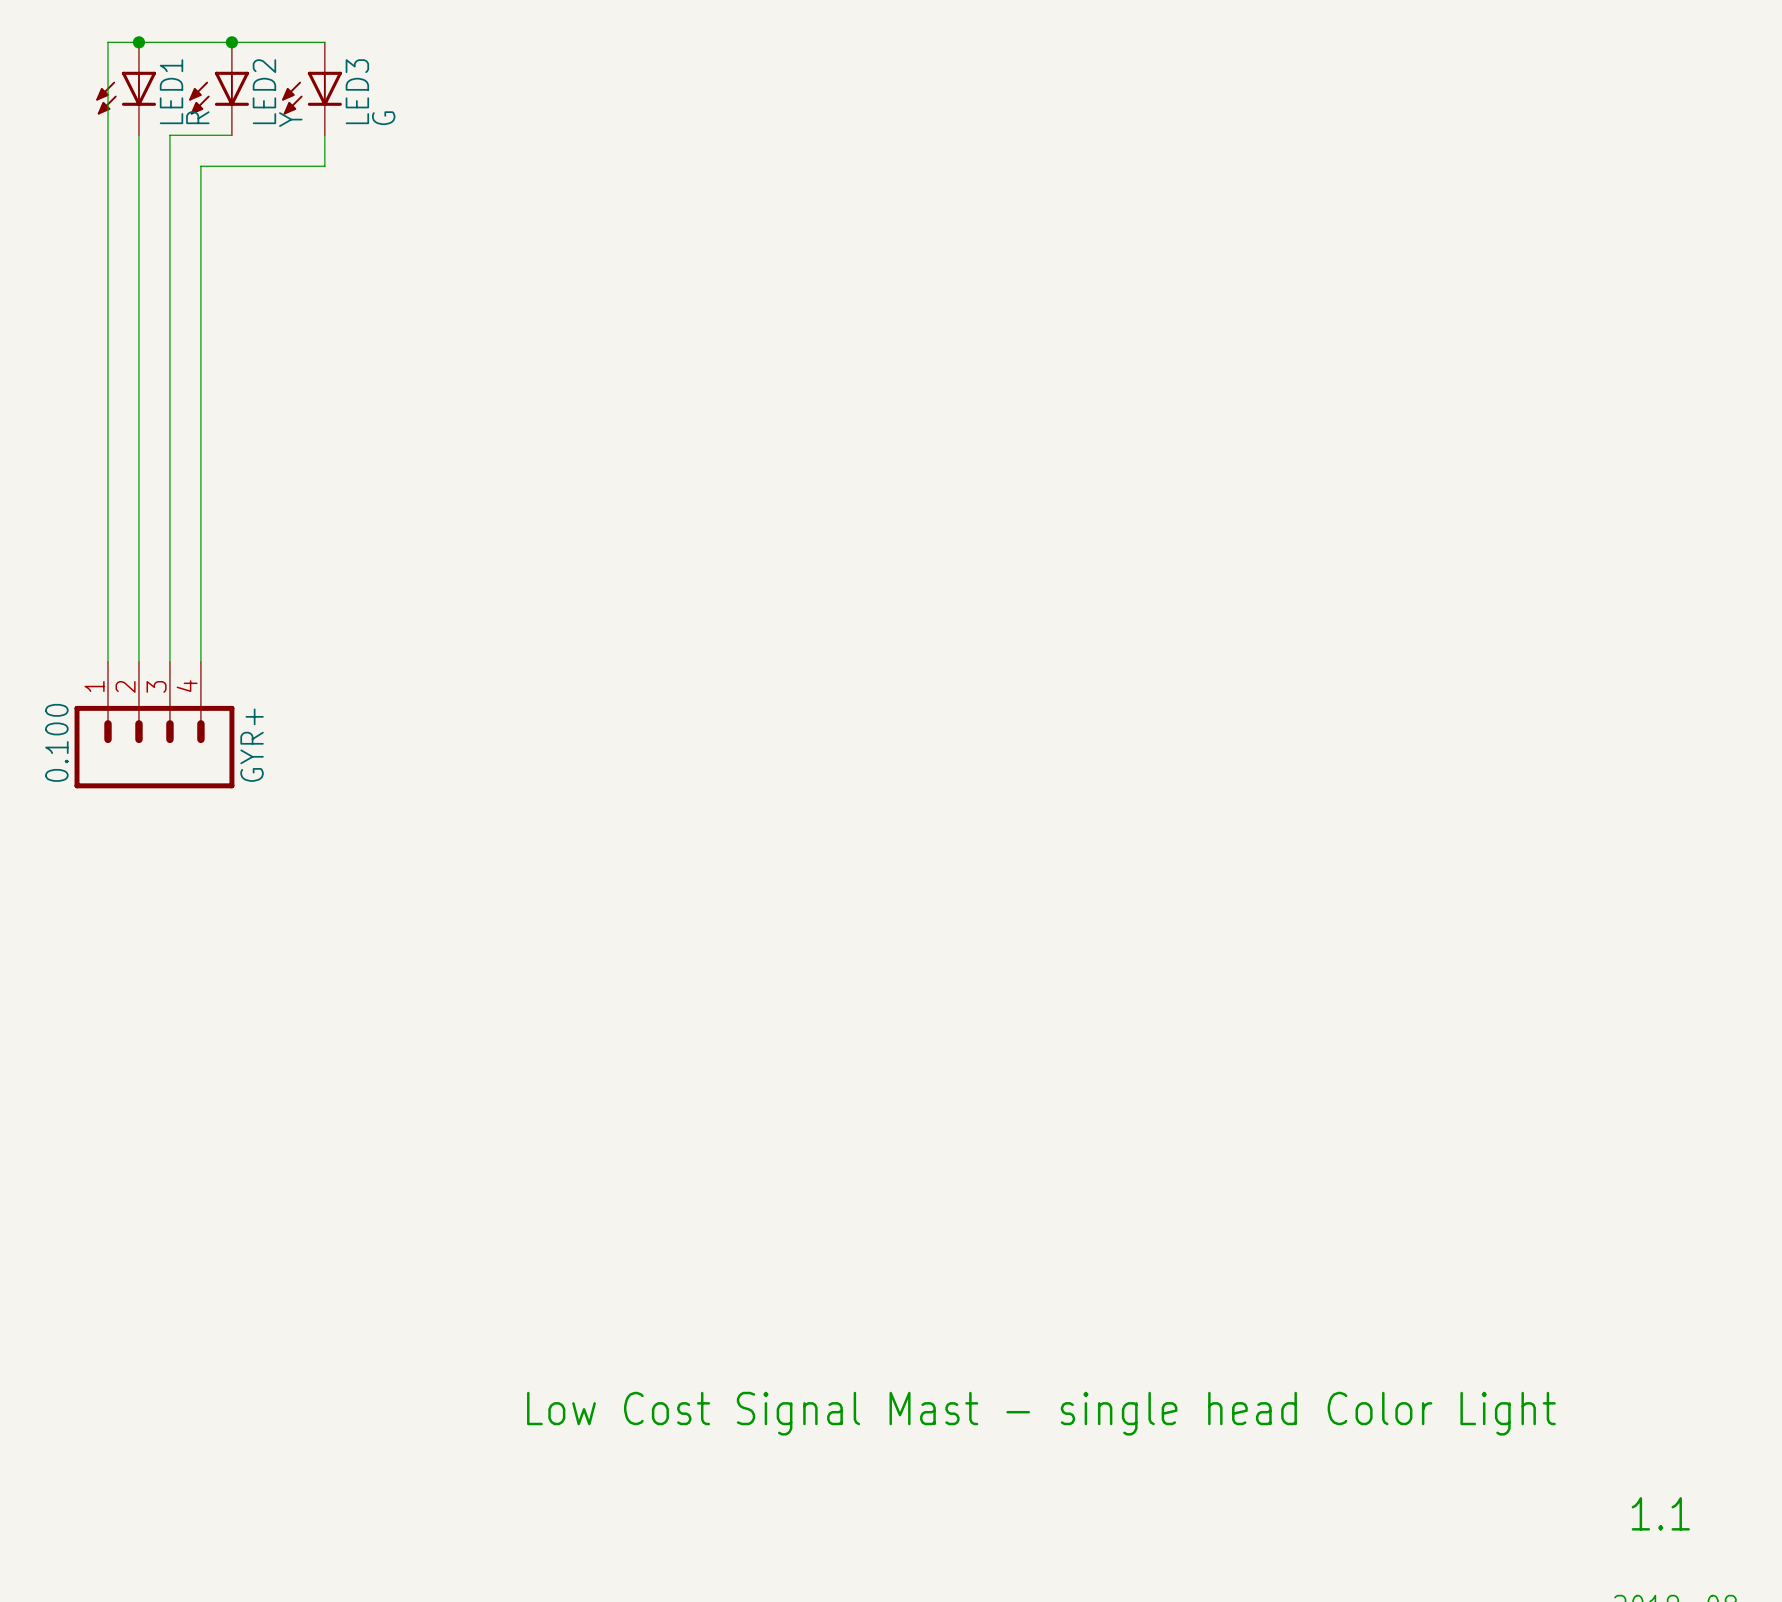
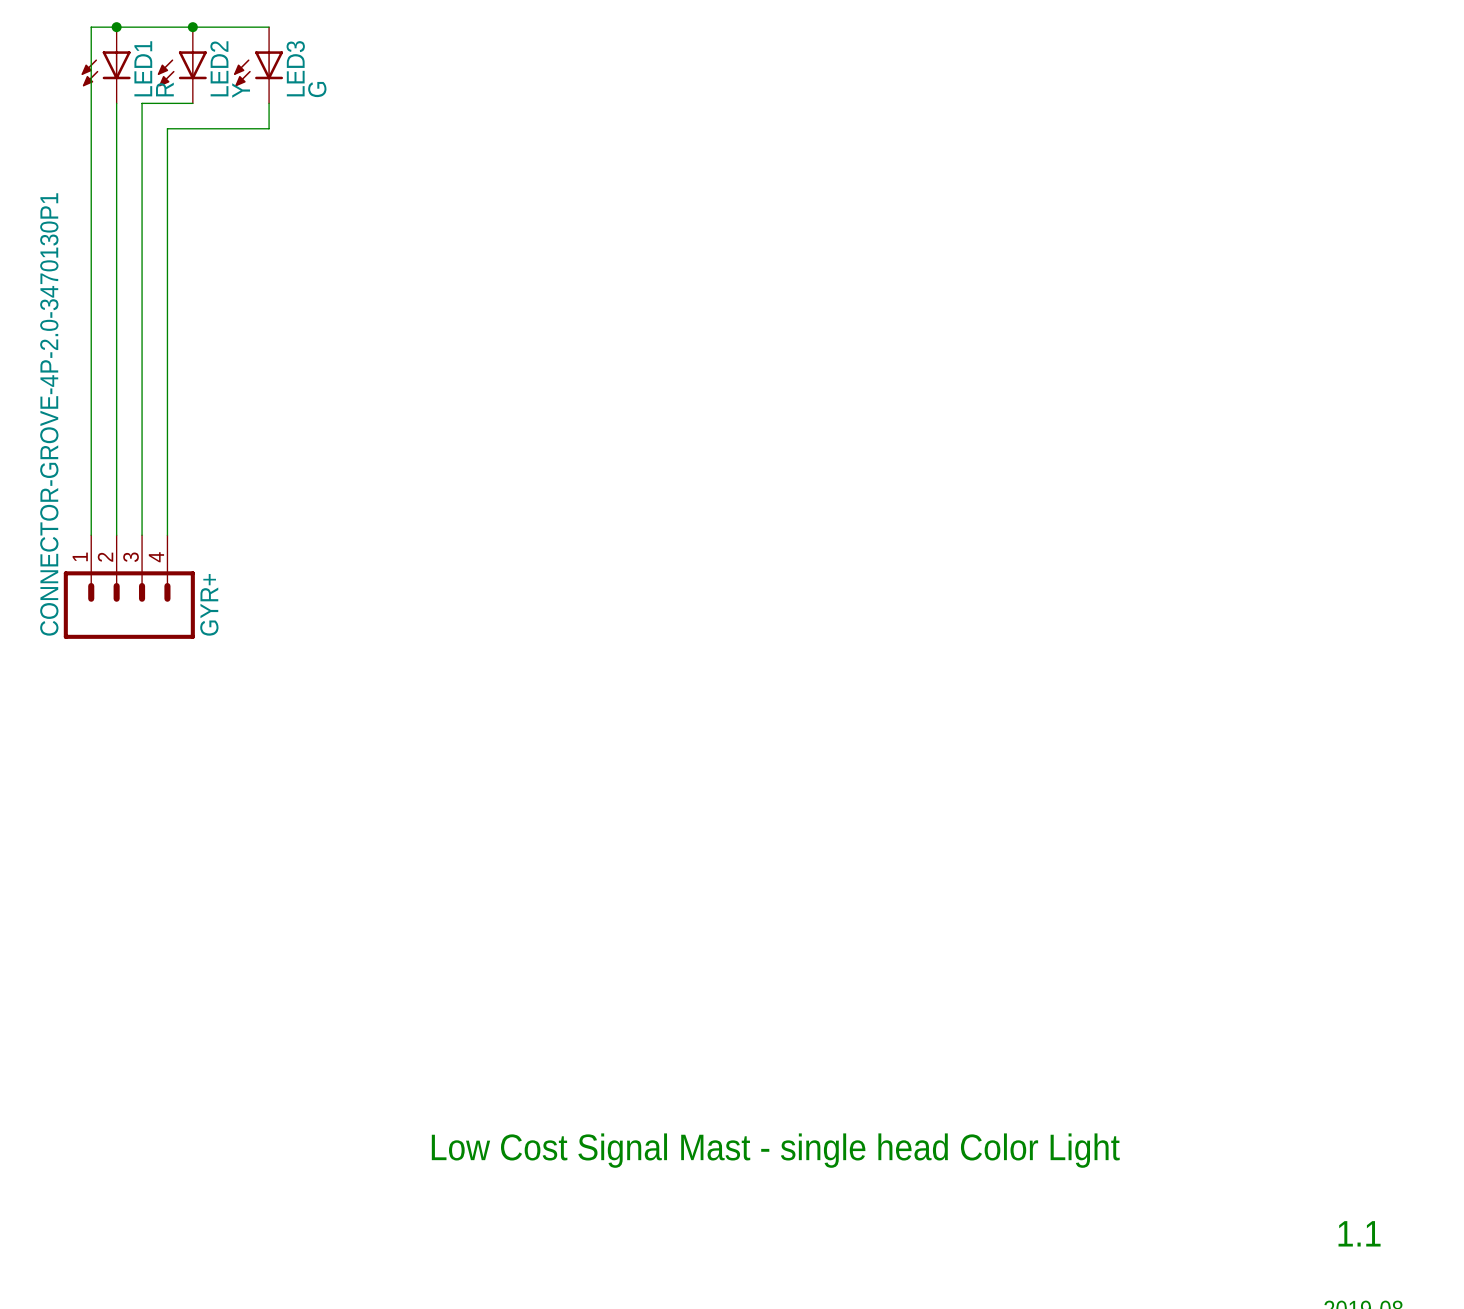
GYR+ value: 0.100 (56, 742) -> CONNECTOR-GROVE-4P-2.0-3470130P1 (49, 414)

